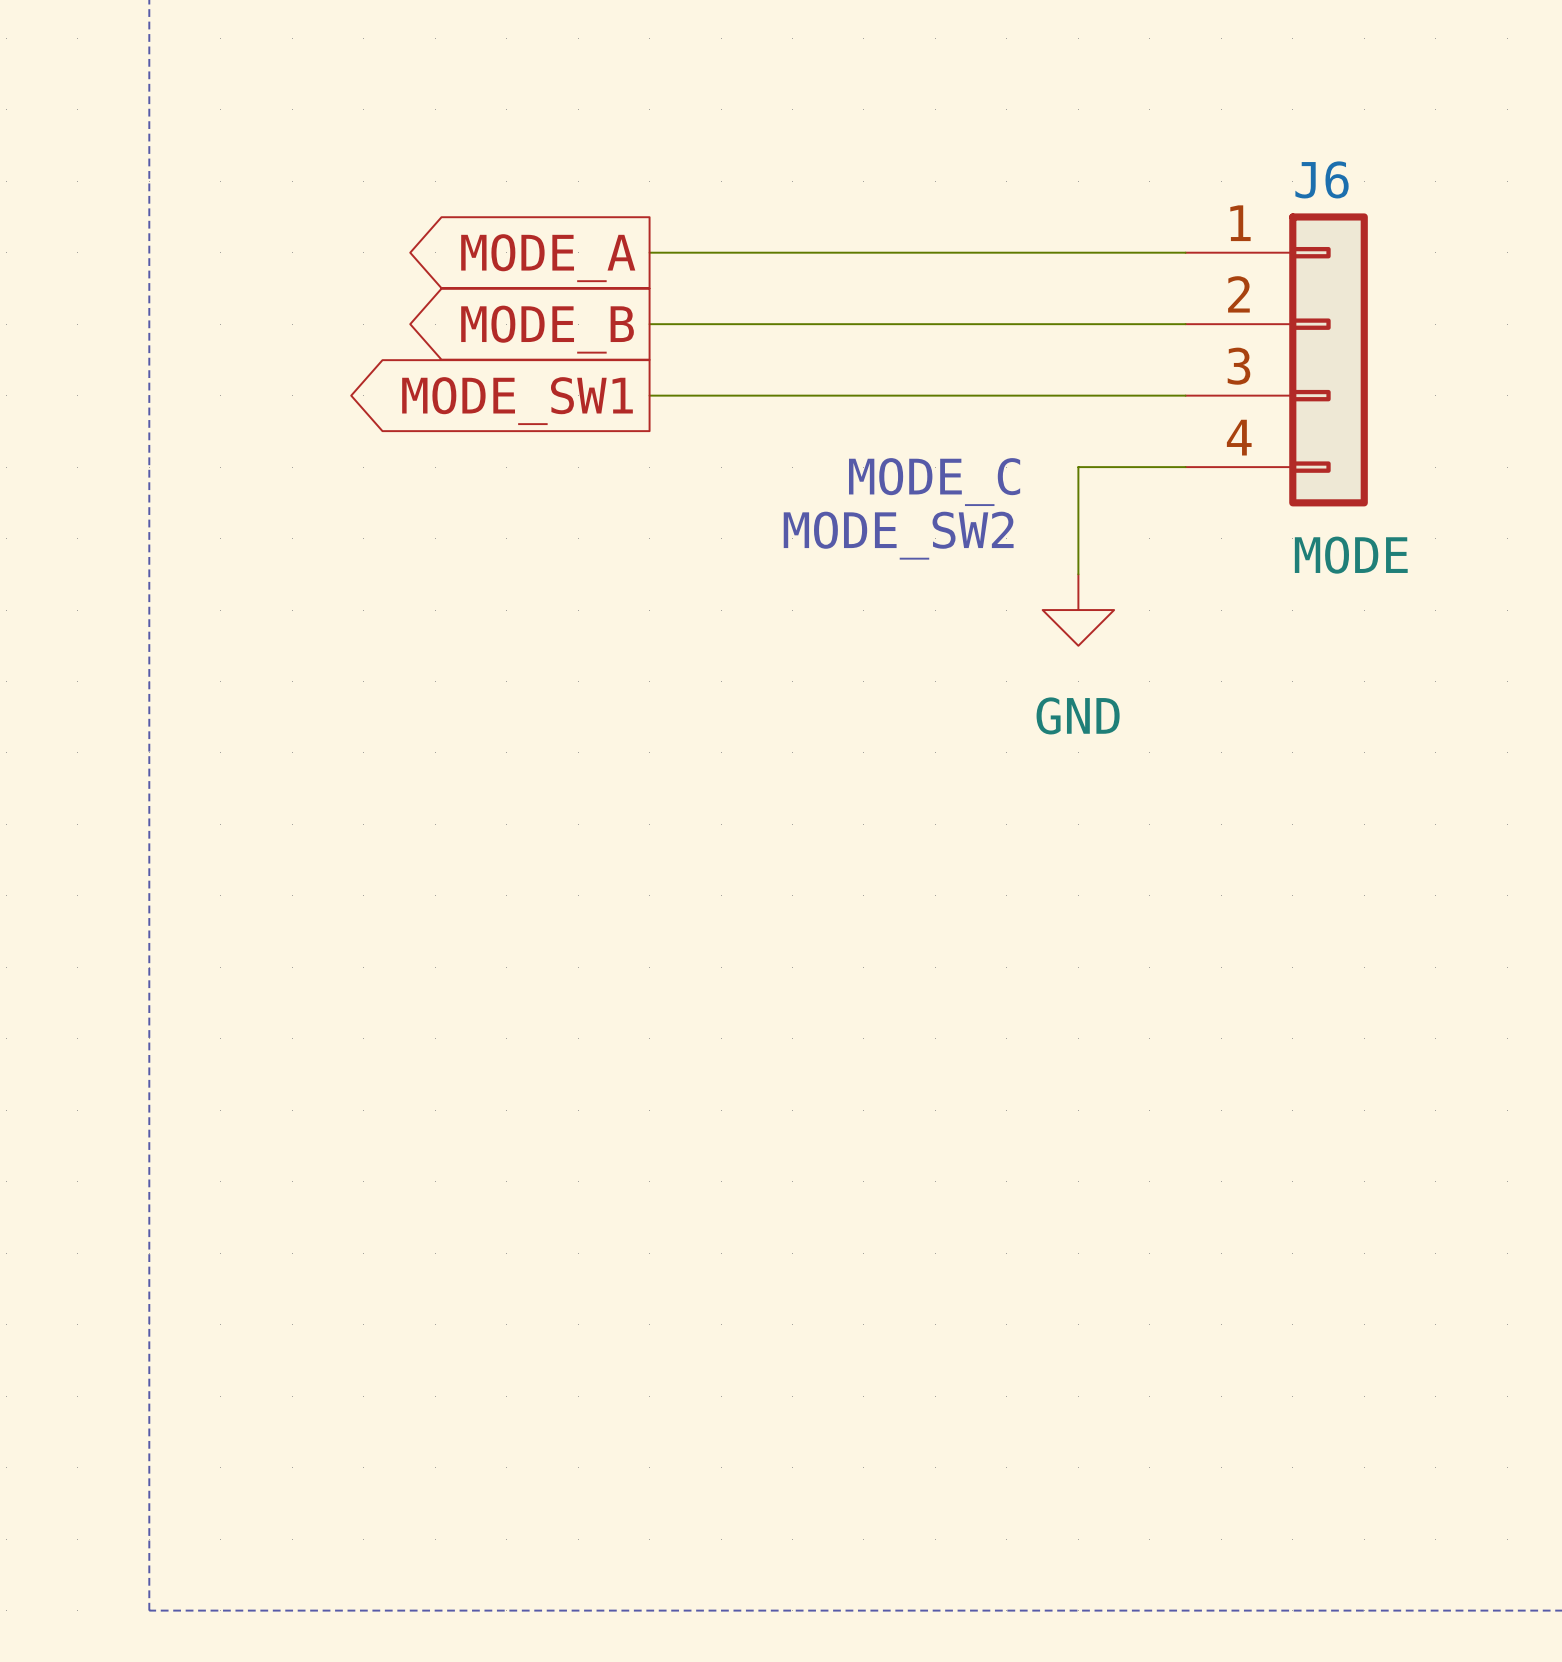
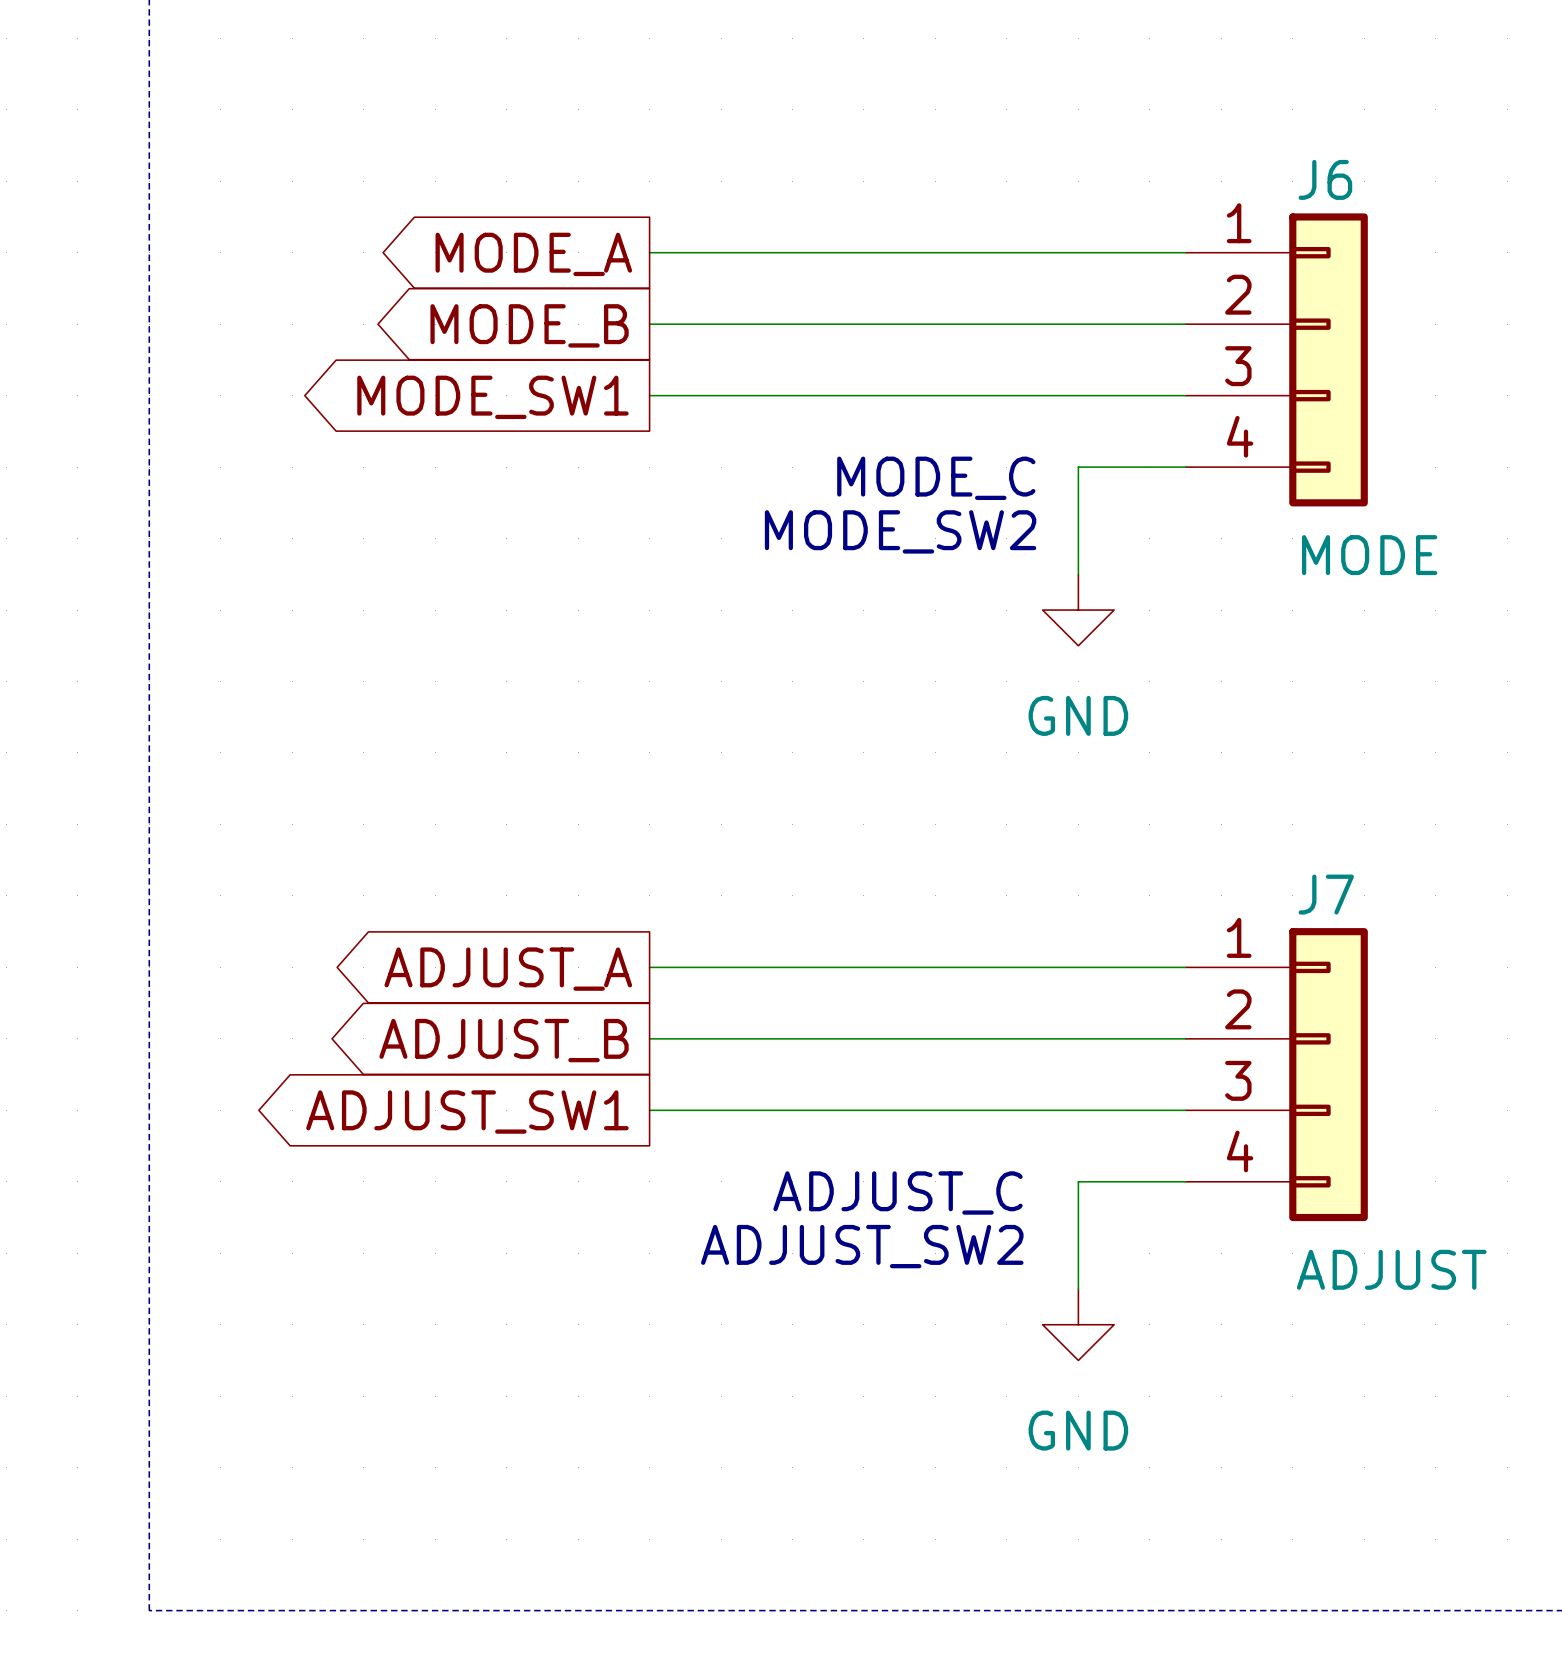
wire: none -> (649, 967) (1185, 967)
global label: none -> ADJUST_A (508, 969)
wire: none -> (649, 1038) (1185, 1038)
global label: none -> ADJUST_B (504, 1040)
J7: none -> ADJUST (1276, 1074)
wire: none -> (649, 1110) (1185, 1110)
global label: none -> ADJUST_SW1 (467, 1112)
wire: none -> (1185, 1181) (1078, 1181) (1078, 1288)
text: none -> ADJUST_C (898, 1192)
text: none -> ADJUST_SW2 (862, 1246)
power symbol: none -> GND (1078, 1324)

